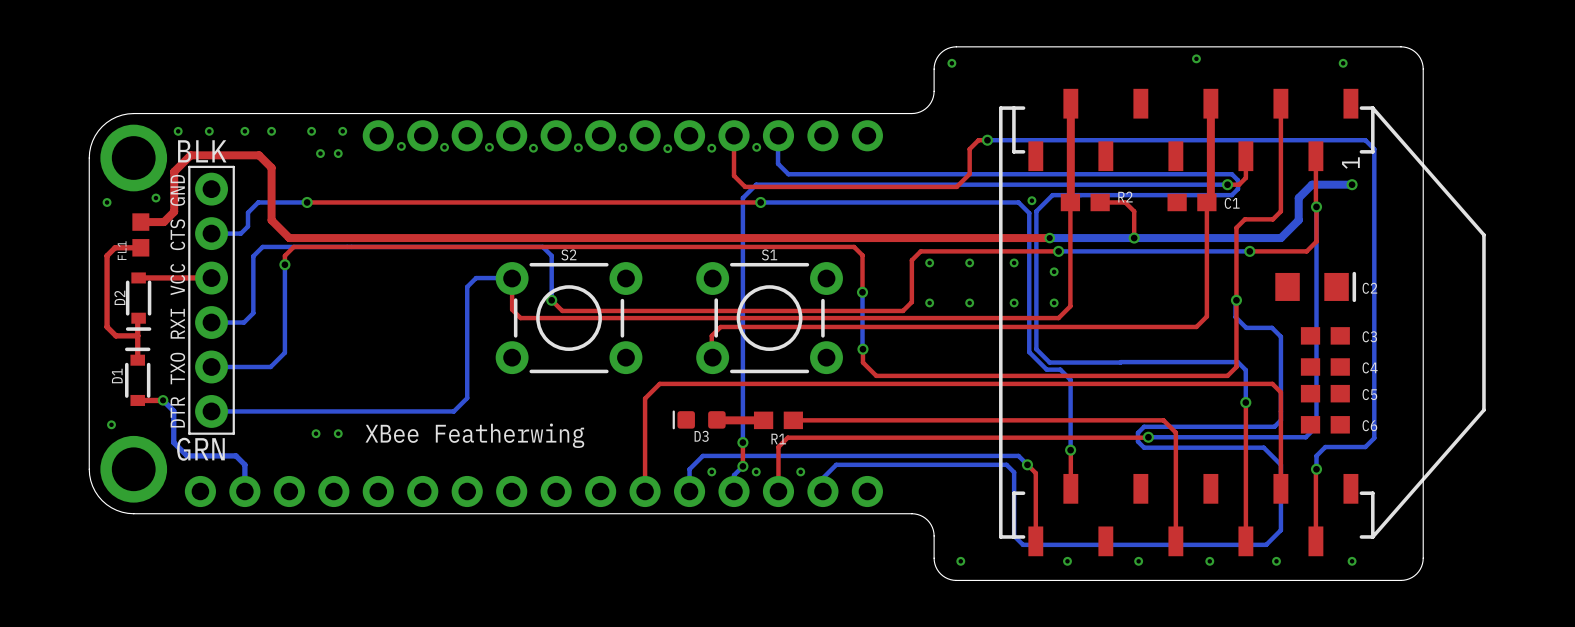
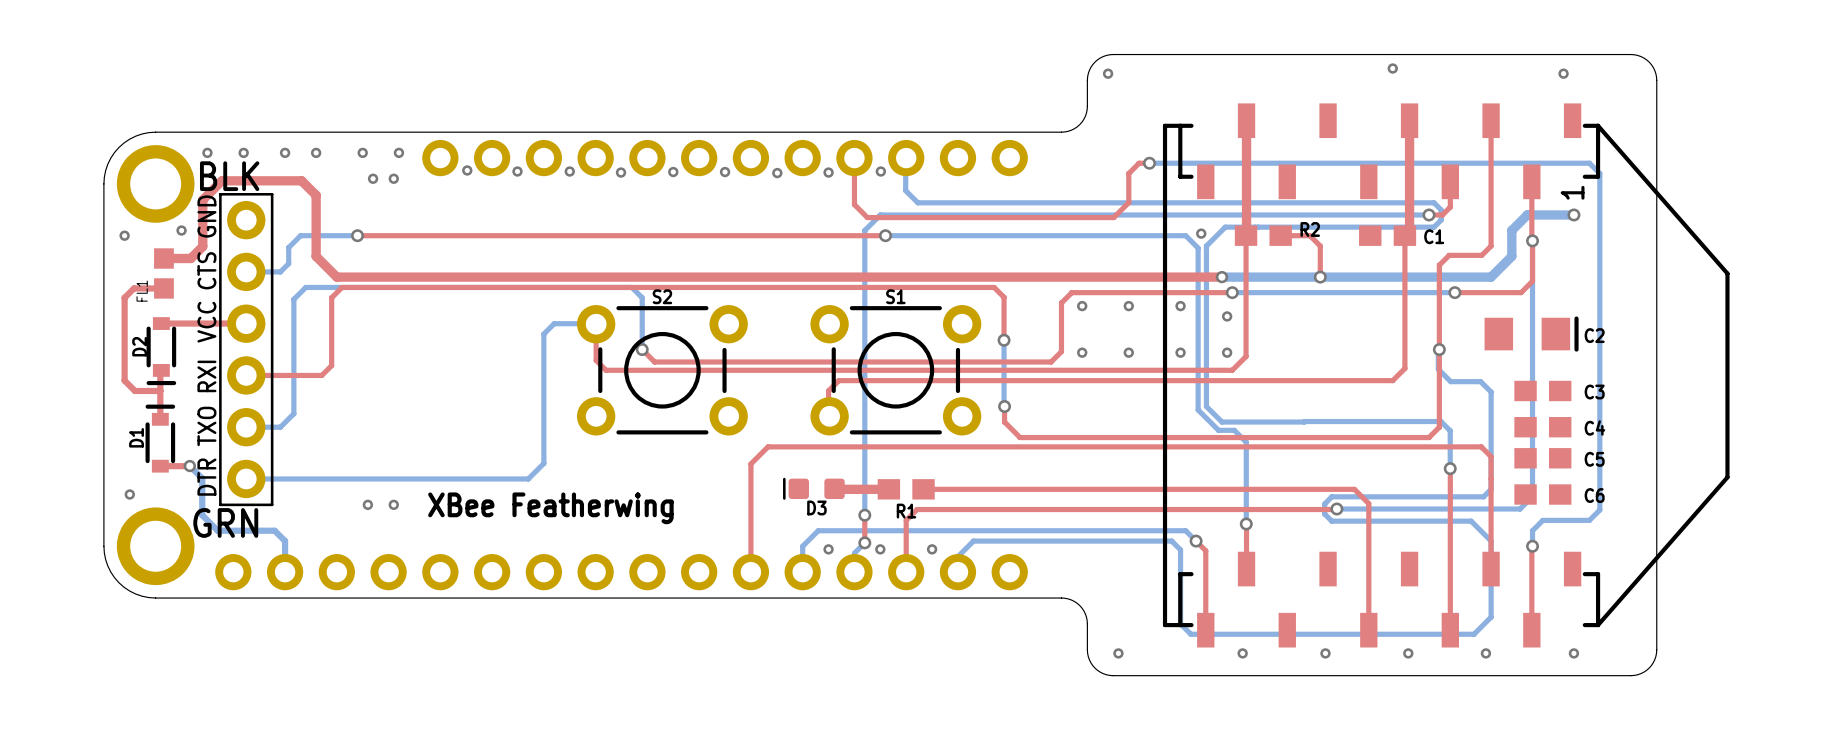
bottom track: (253, 256) (253, 313) (244, 322) (211, 322) -> none
top track: none -> (331, 308) (331, 365) (321, 375) (246, 375)
bottom track: (284, 264) (284, 352) (270, 366) (240, 366) -> (294, 298) (293, 413) (280, 427)
via: (284, 264) -> none

